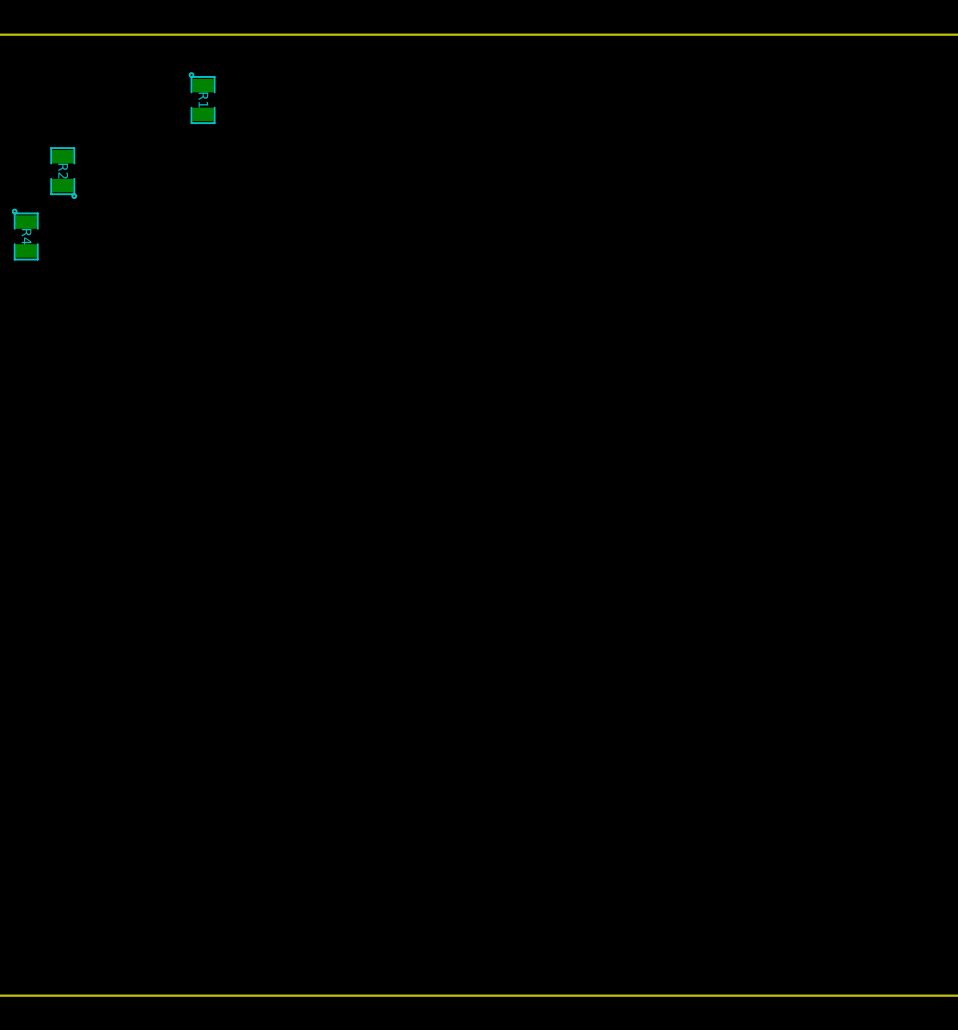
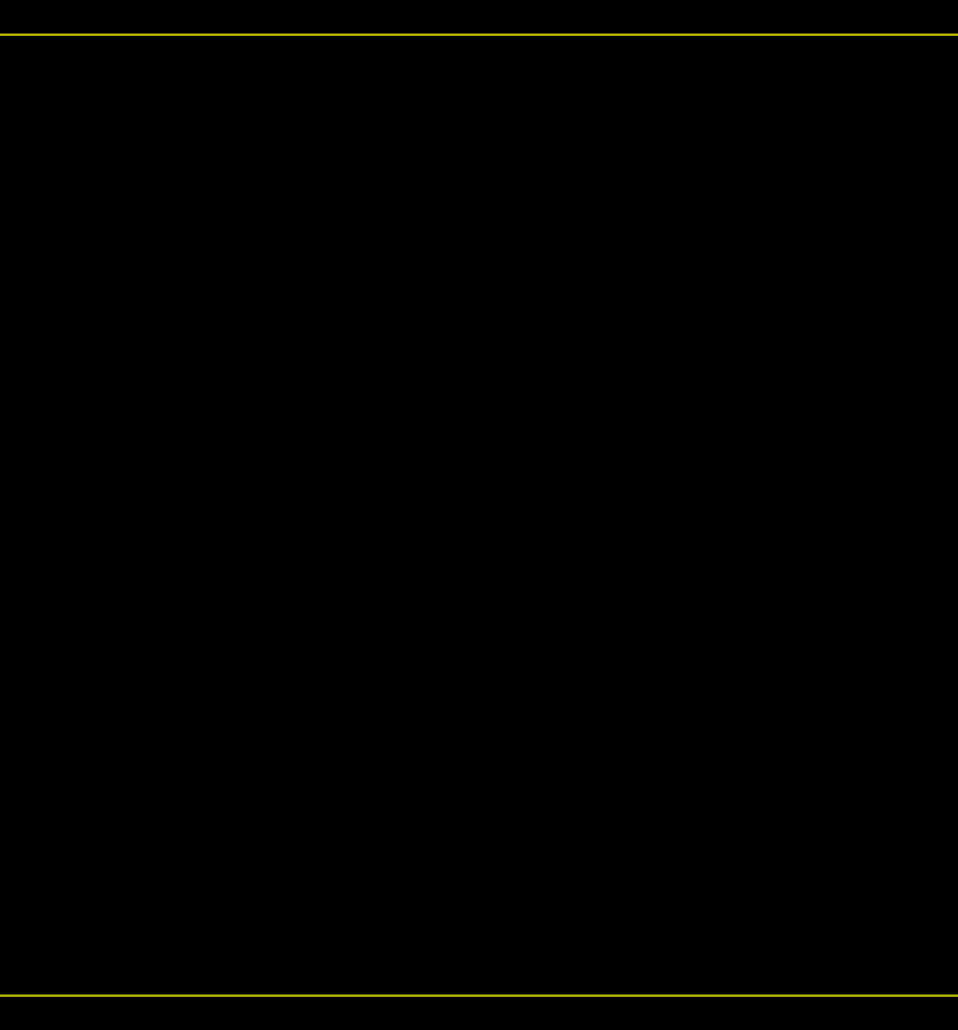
R1: (202, 98) -> none
R2: (63, 173) -> none
R4: (25, 234) -> none

